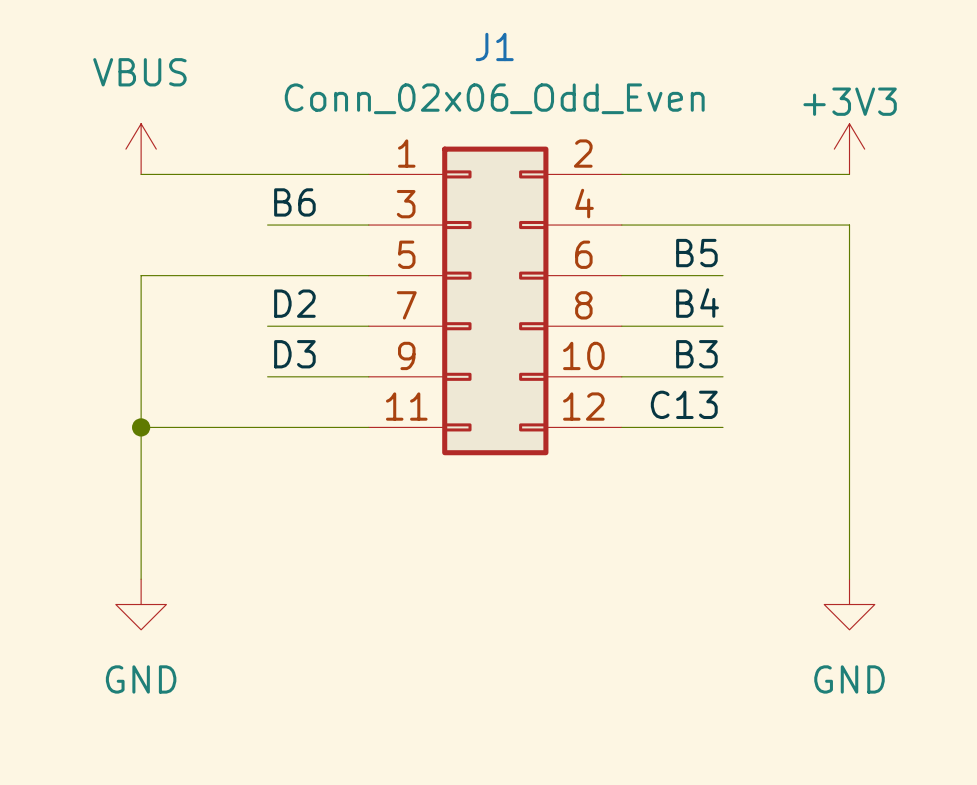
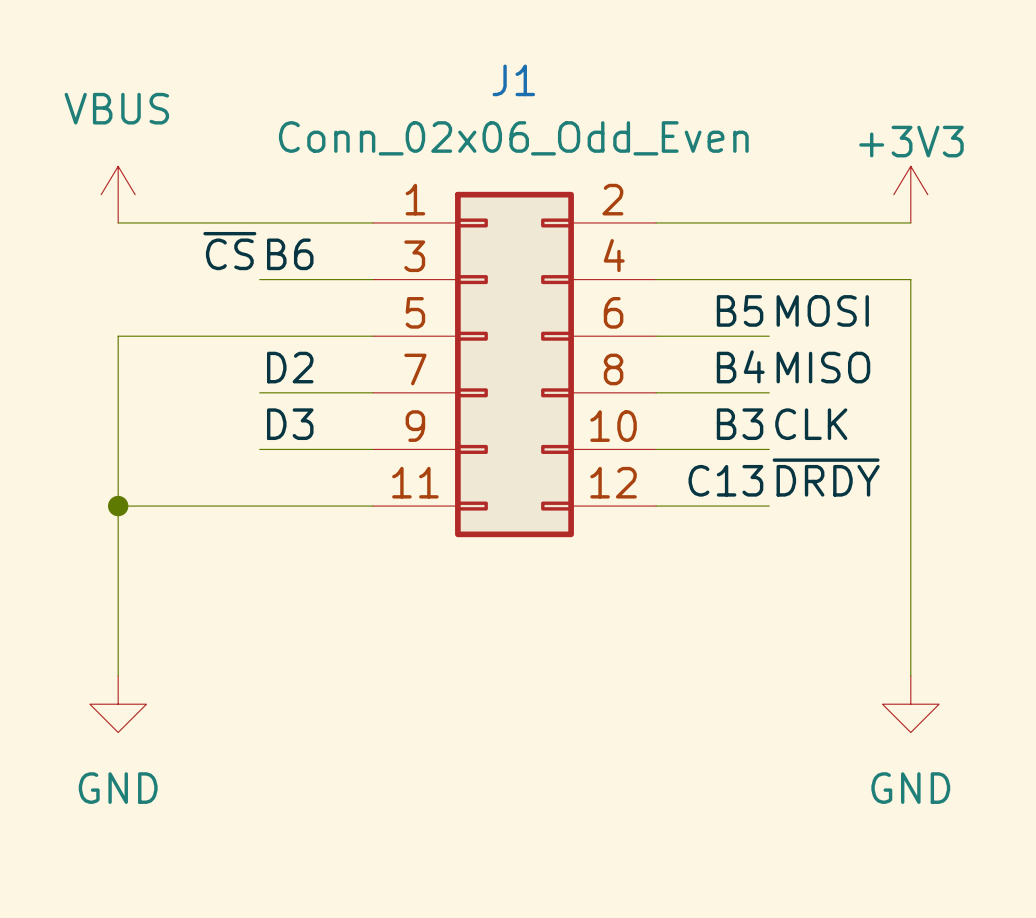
label: none -> ~{CS} (229, 251)
label: none -> MOSI (822, 310)
label: none -> MISO (823, 367)
label: none -> CLK (811, 424)
label: none -> ~{DRDY} (826, 477)

